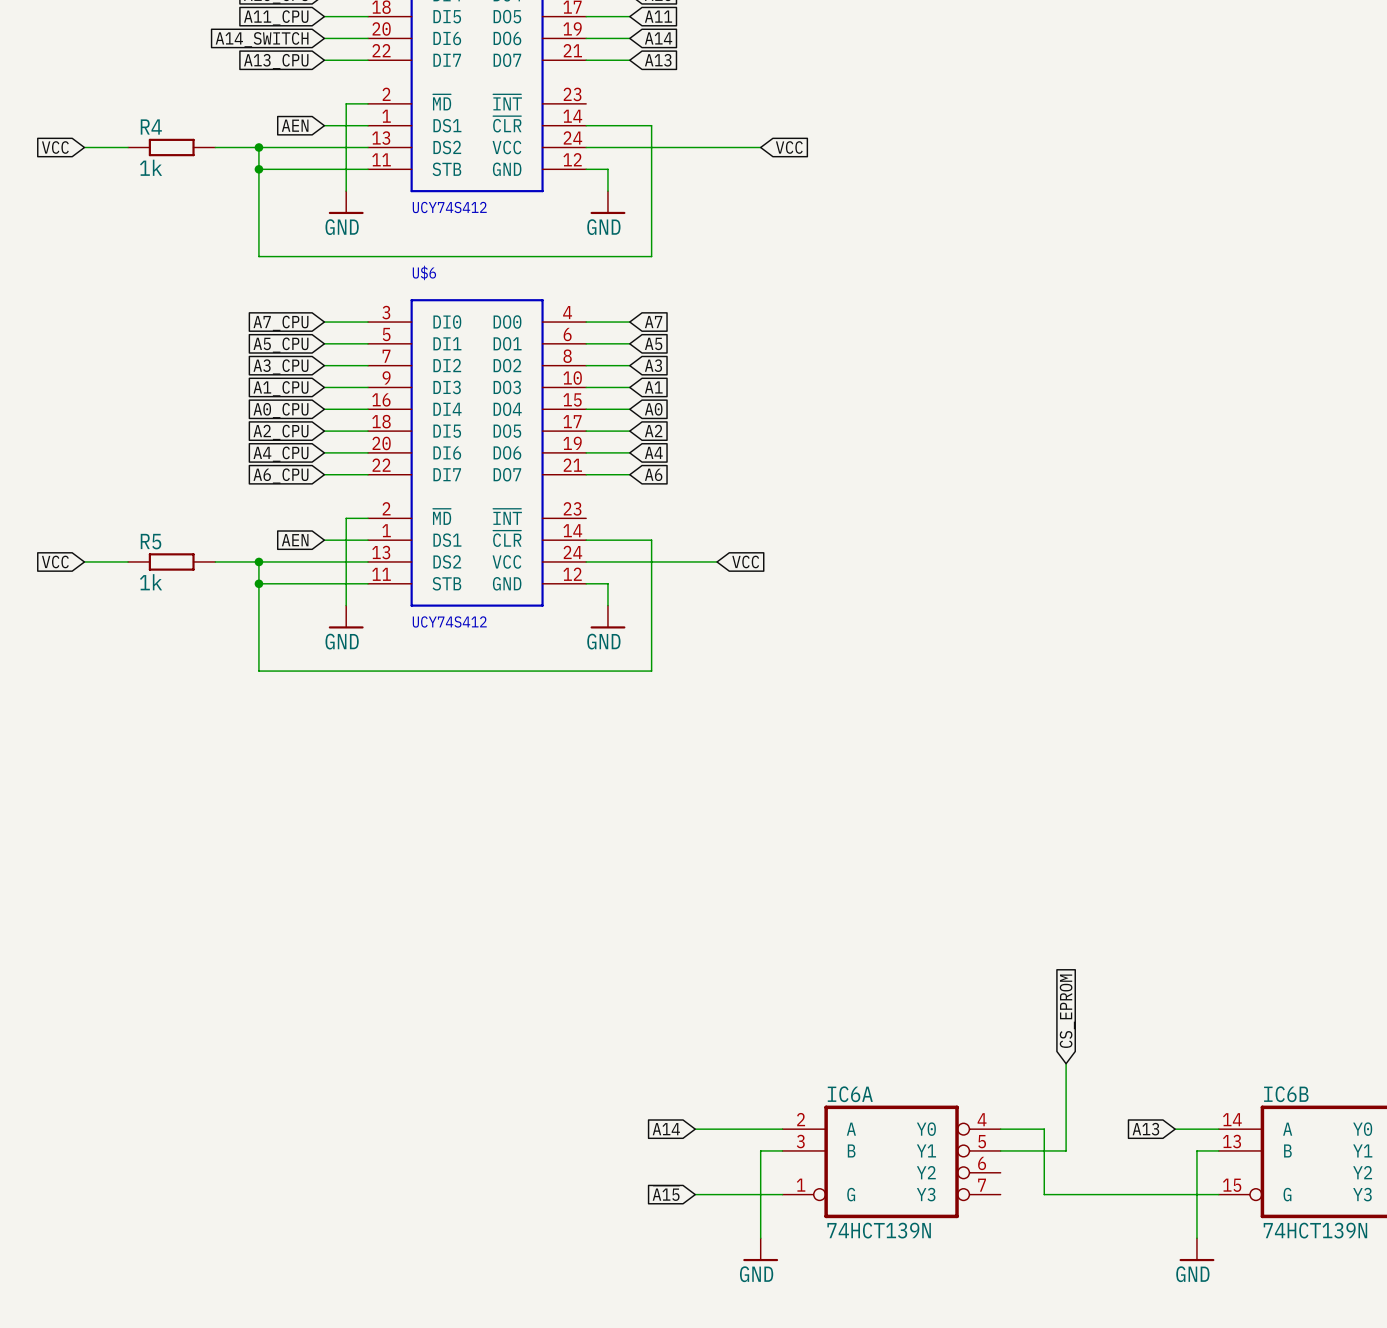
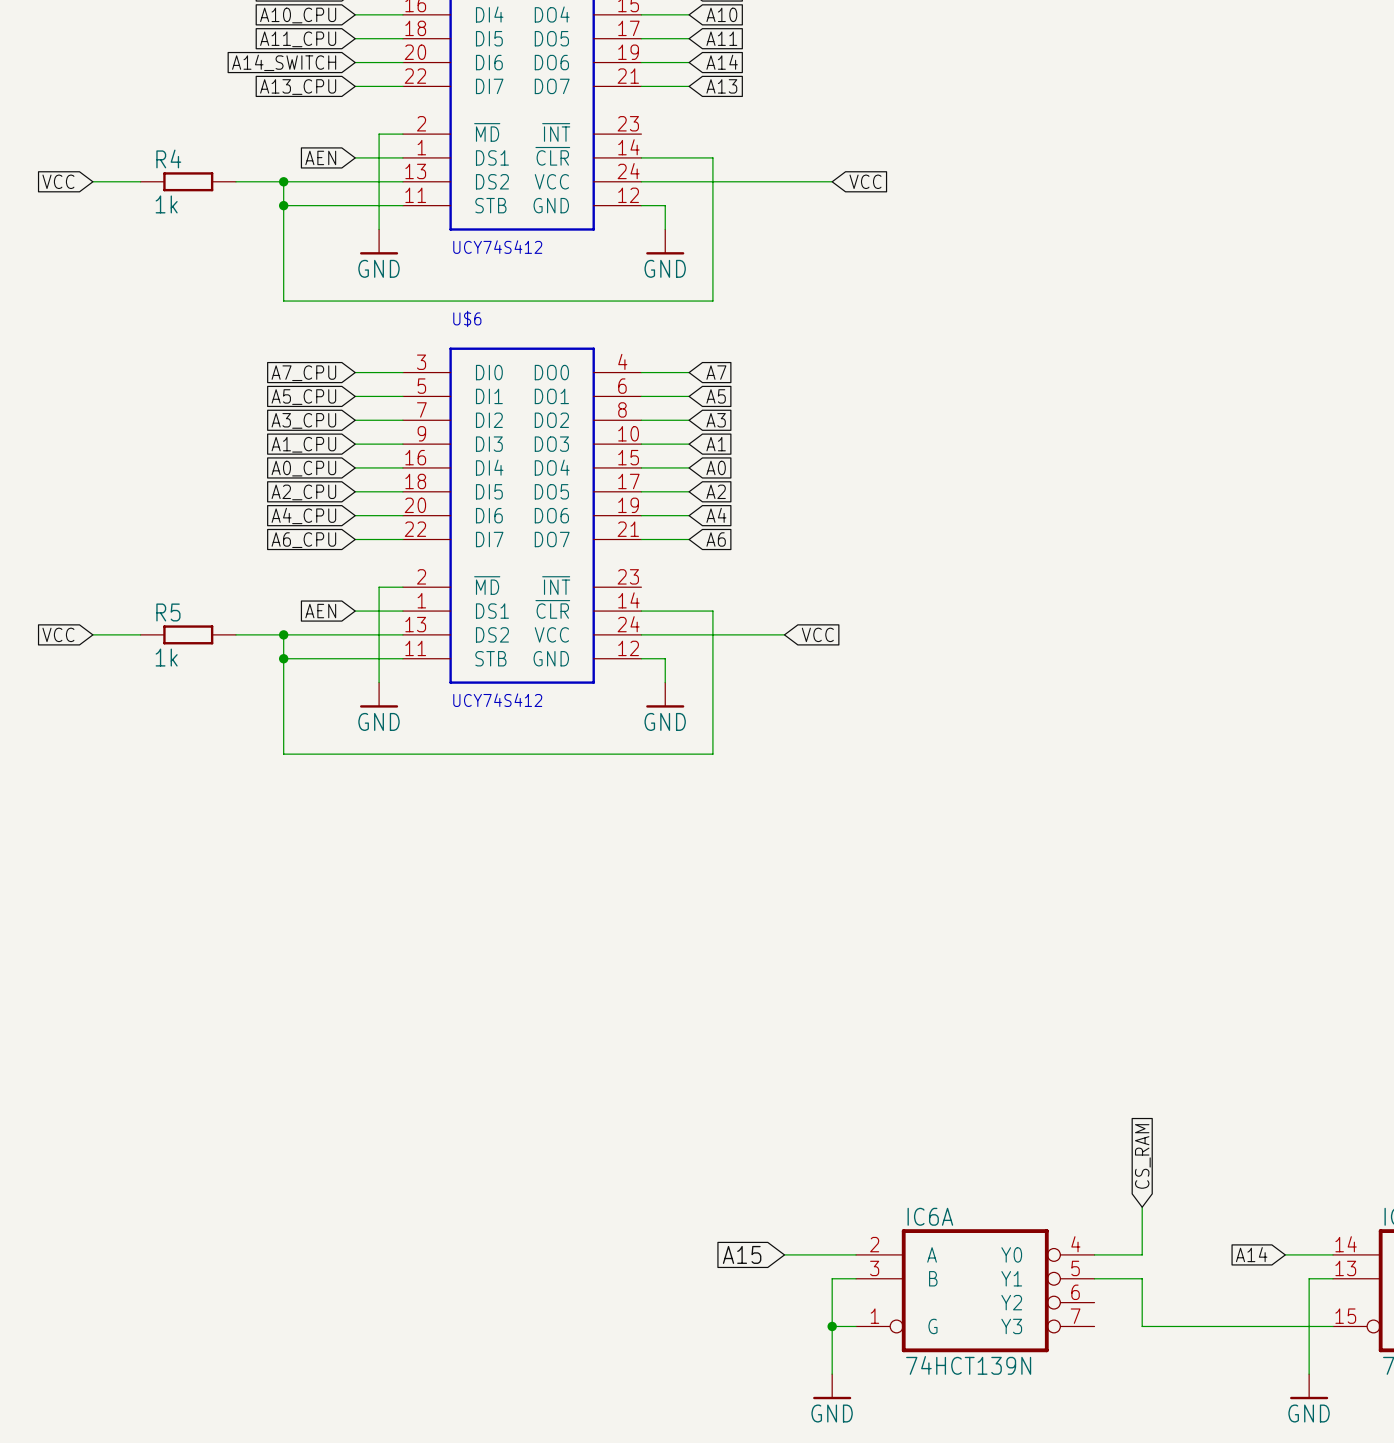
global label: CS_EPROM (1067, 1011) -> CS_RAM (1142, 1156)
wire: (1066, 1063) (1066, 1150) (1044, 1150) (1044, 1129) -> (1142, 1207) (1142, 1254)
global label: A14 (666, 1129) -> A15 (742, 1254)
wire: (695, 1129) (717, 1129) -> none
global label: A13 (1145, 1129) -> A14 (1251, 1254)
global label: ~{A15} (666, 1193) -> none
wire: (695, 1194) (760, 1194) -> none
junction: none -> (832, 1326)

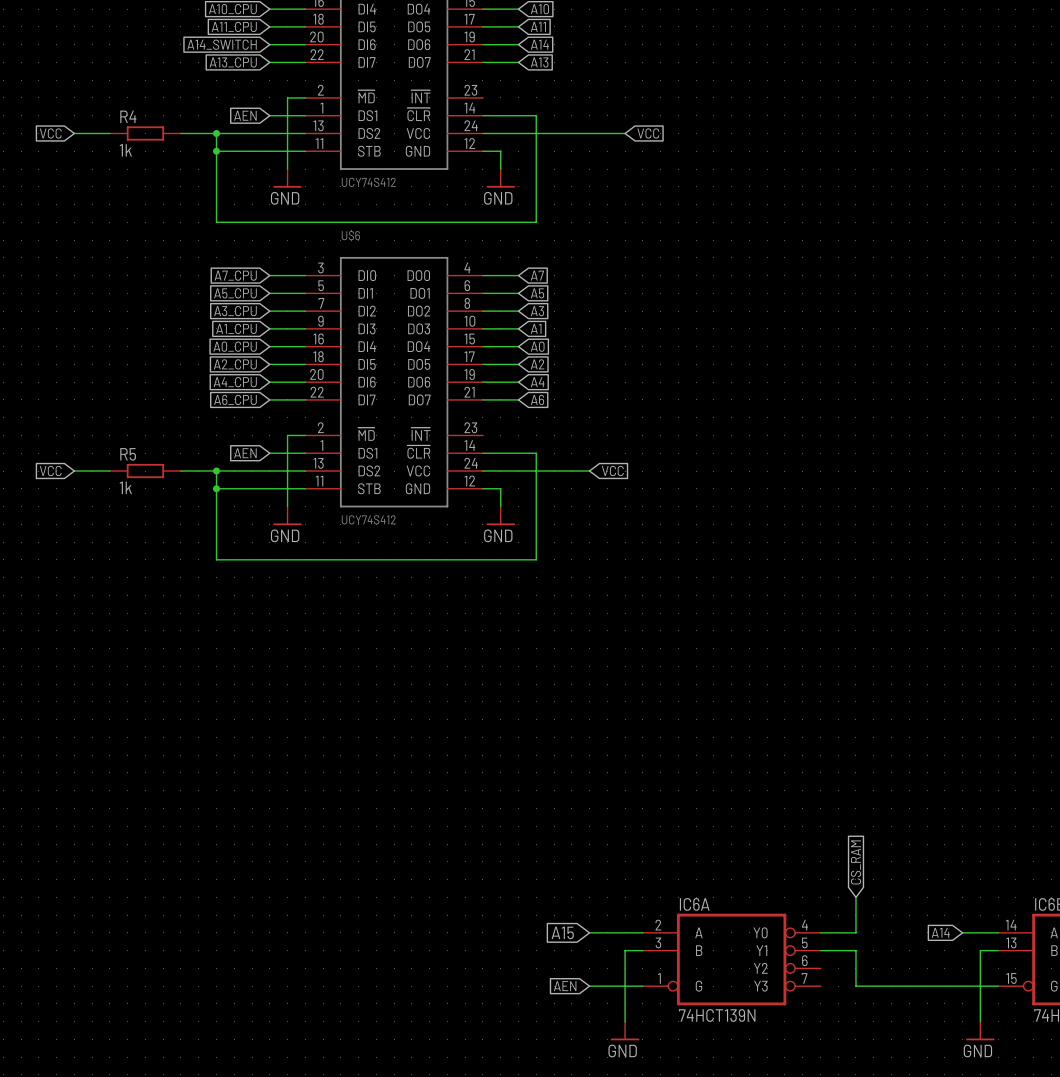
global label: none -> AEN (565, 986)
wire: none -> (589, 986) (625, 986)
junction: (832, 1326) -> none

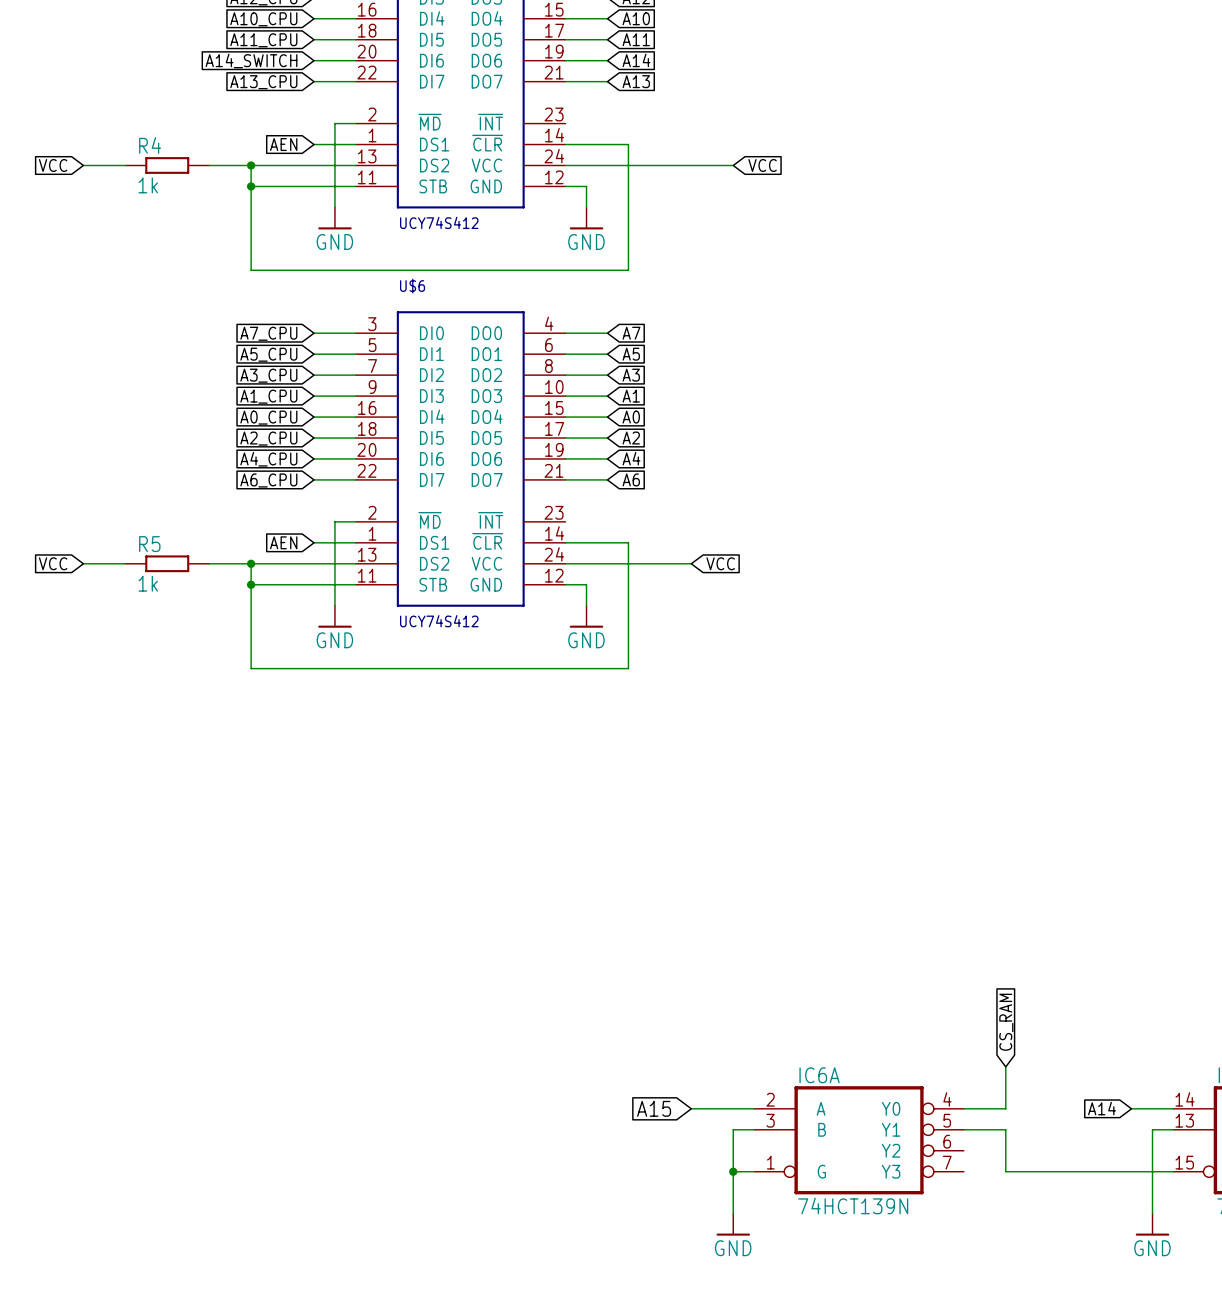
global label: AEN (565, 986) -> none
wire: (589, 986) (625, 986) -> none
junction: none -> (733, 1171)

